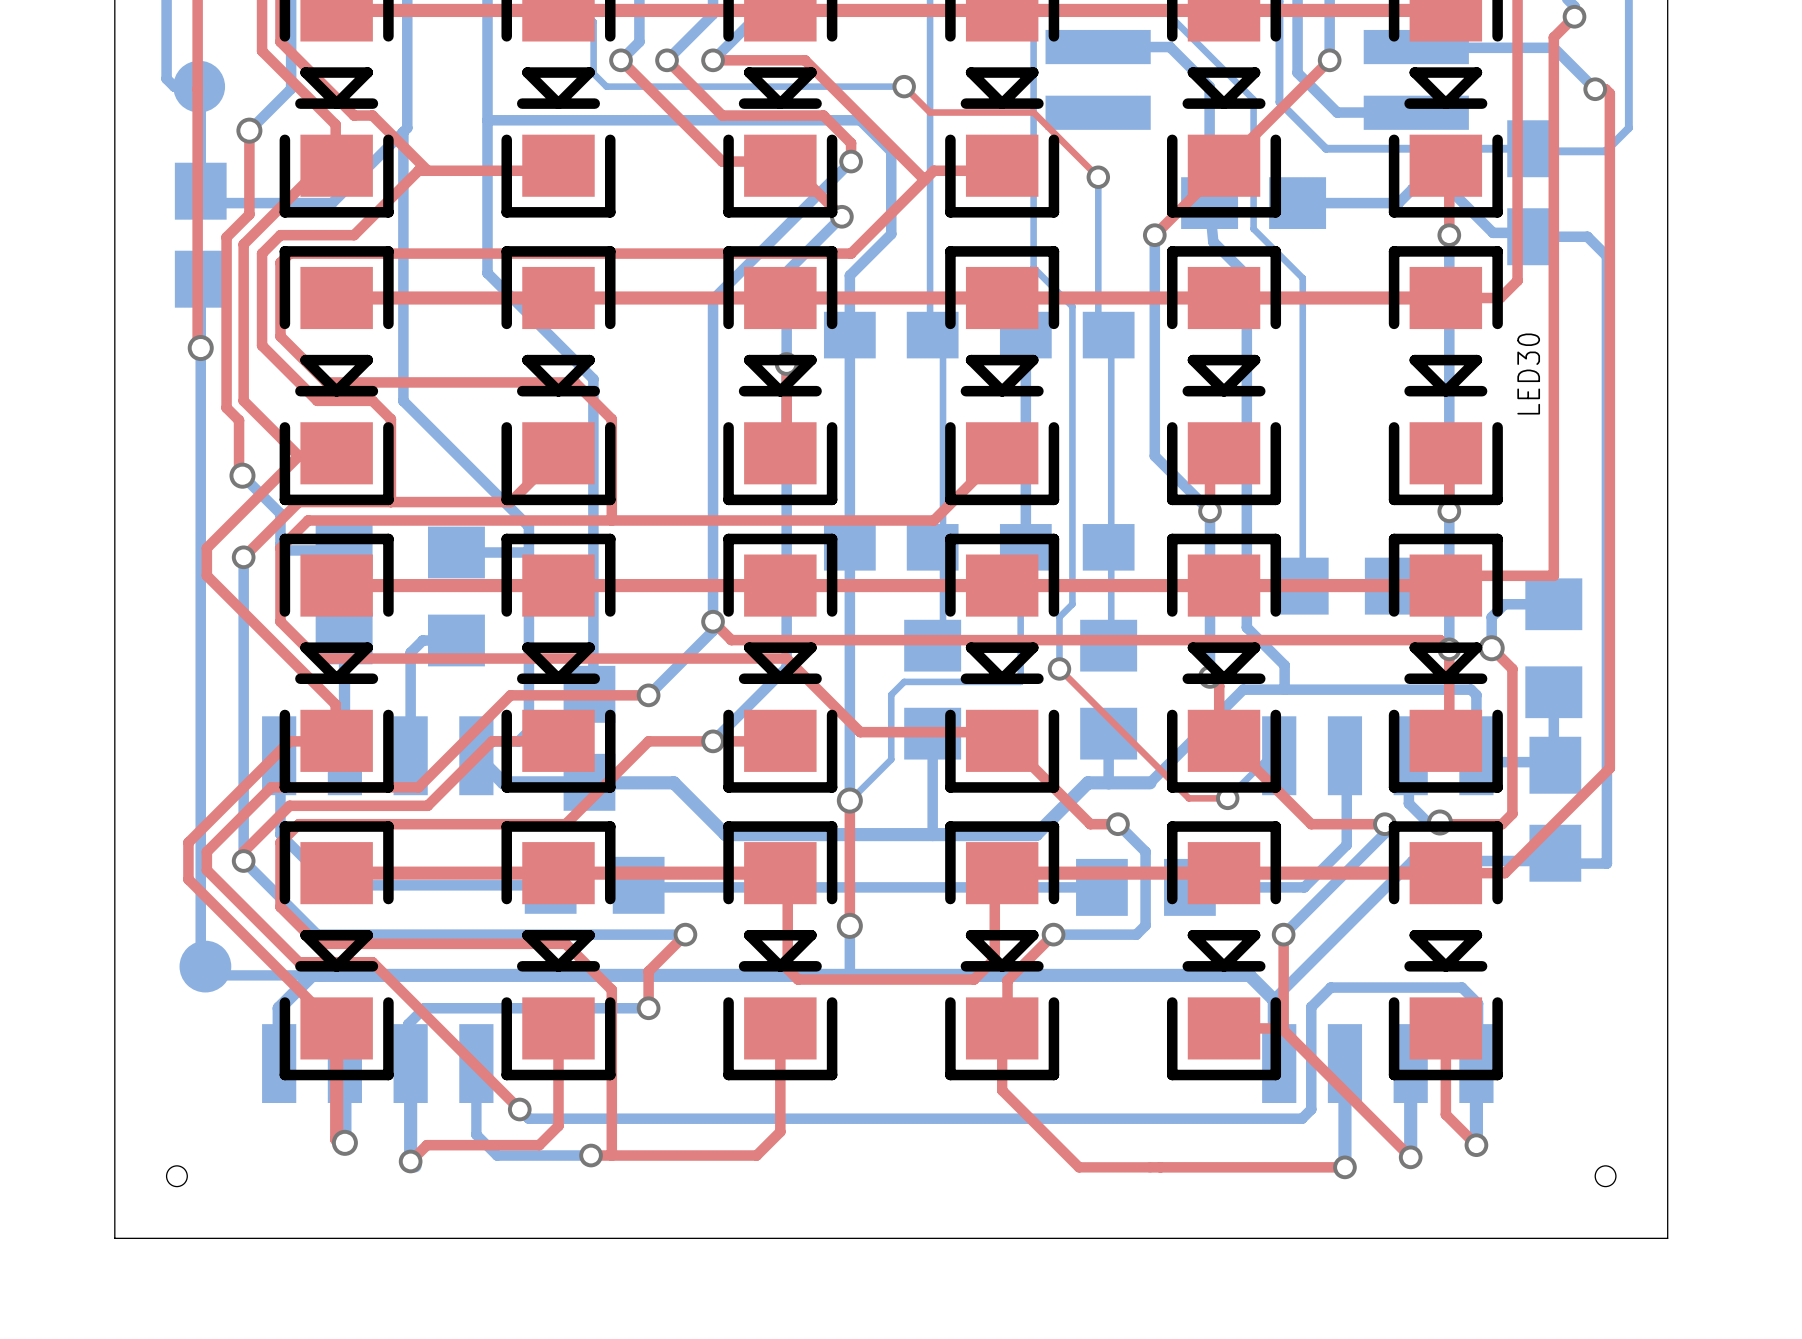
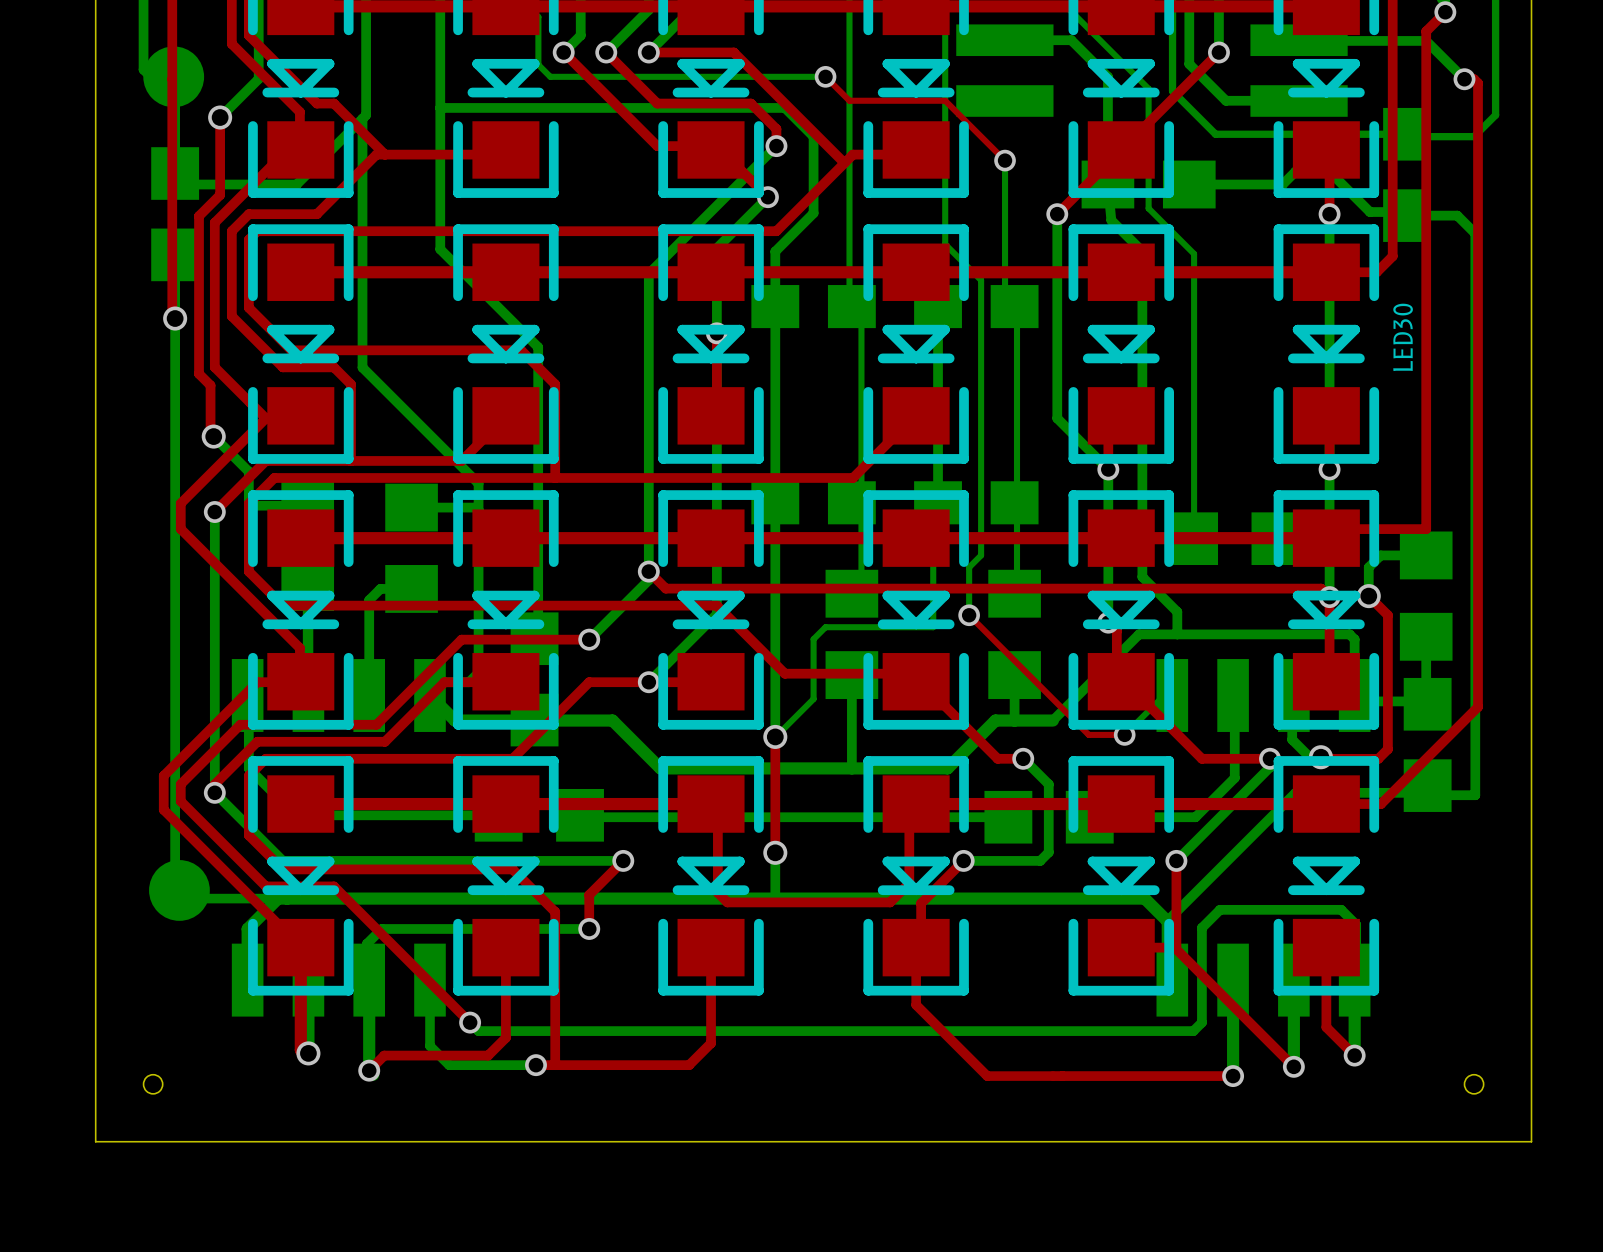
part footprint: [173, 60, 226, 113] -> [143, 46, 205, 108]
part footprint: [179, 940, 232, 993] -> [149, 860, 210, 921]

